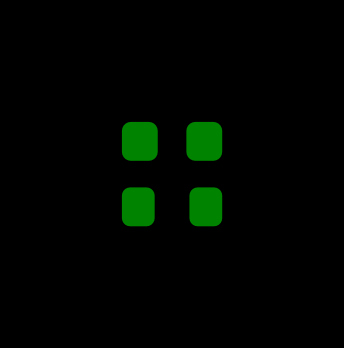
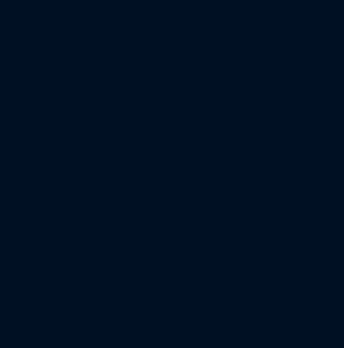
part: (172, 141) -> none
part: (172, 206) -> none

